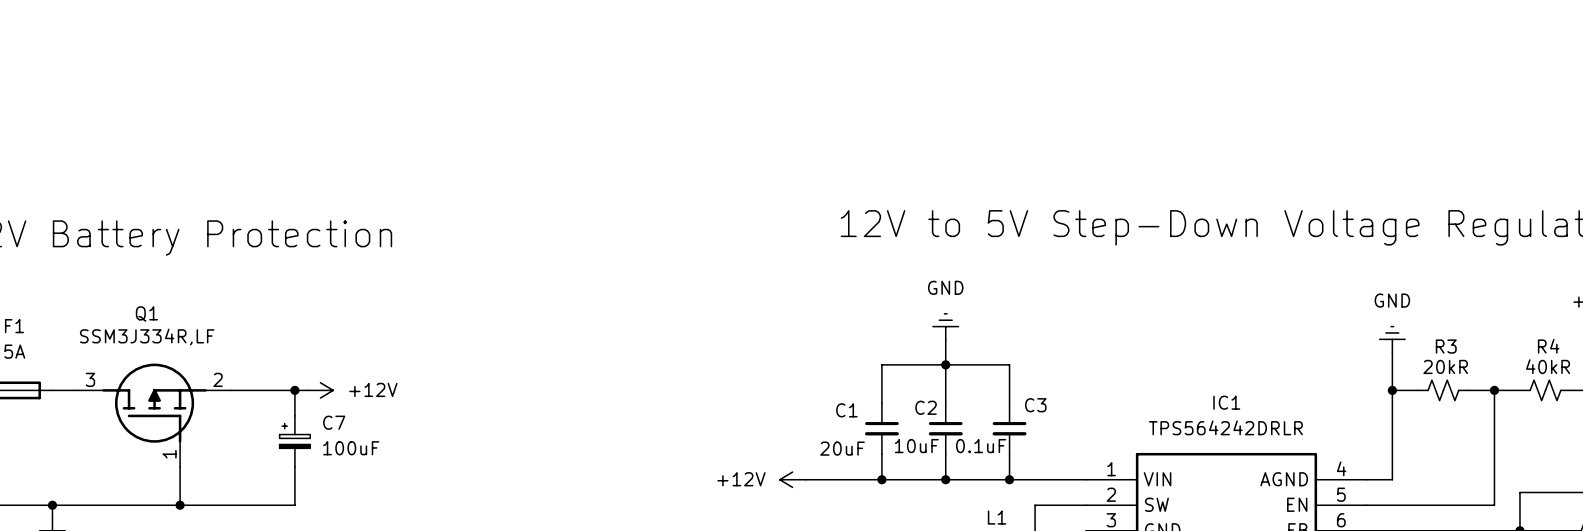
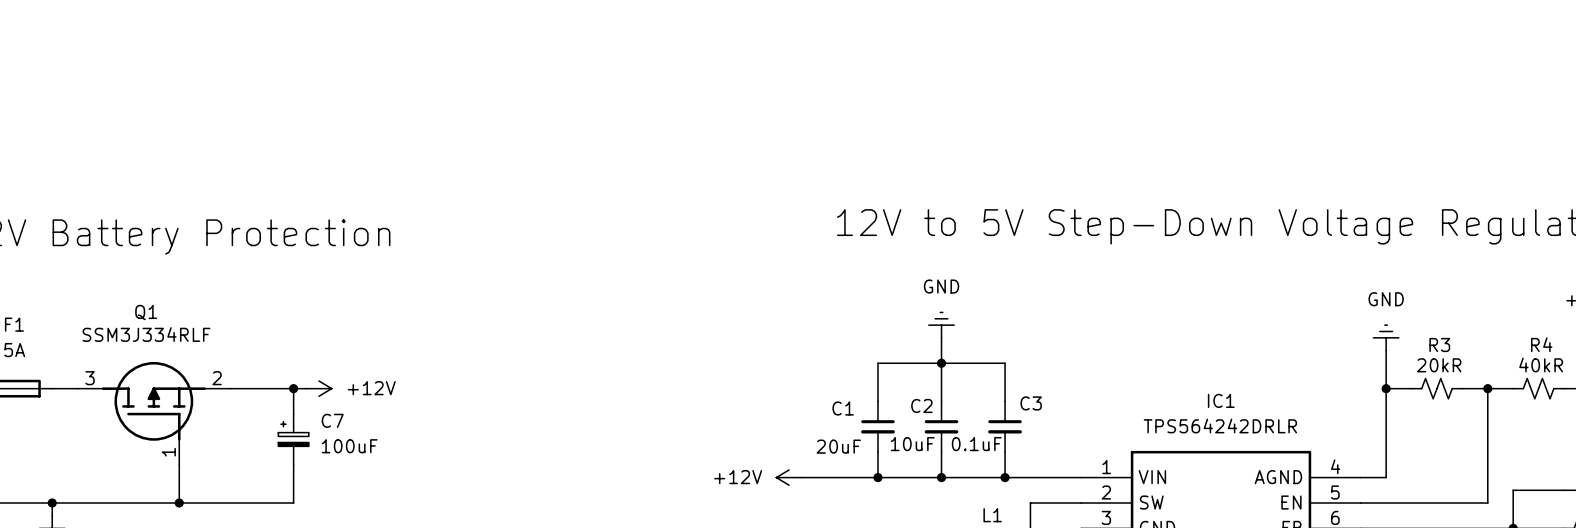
Q1 value: SSM3J334R,LF (147, 336) -> SSM3J334RLF (146, 334)

